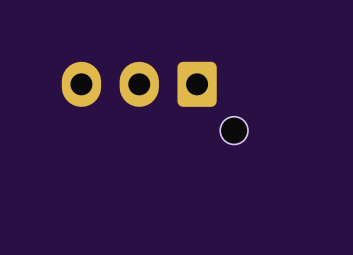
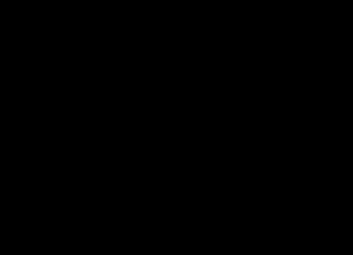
part: (154, 103) -> none

